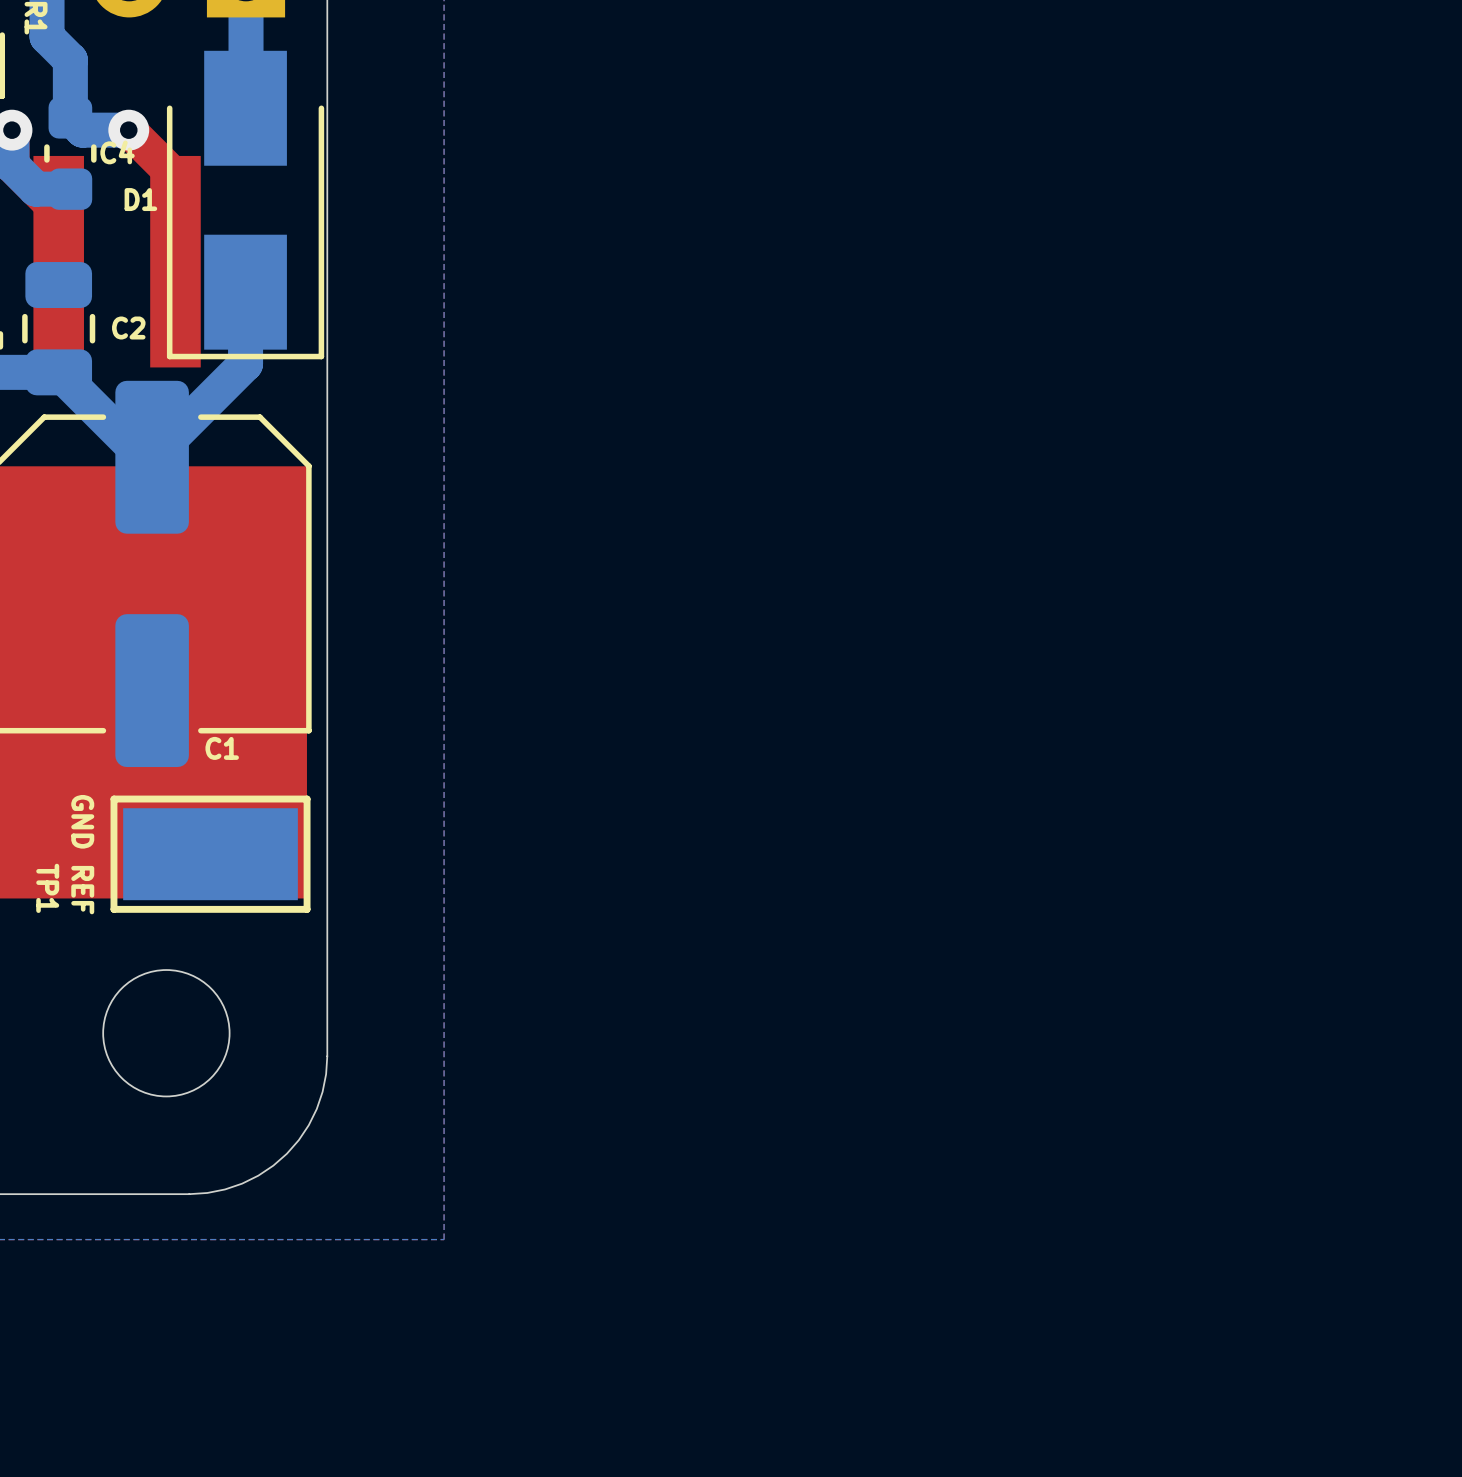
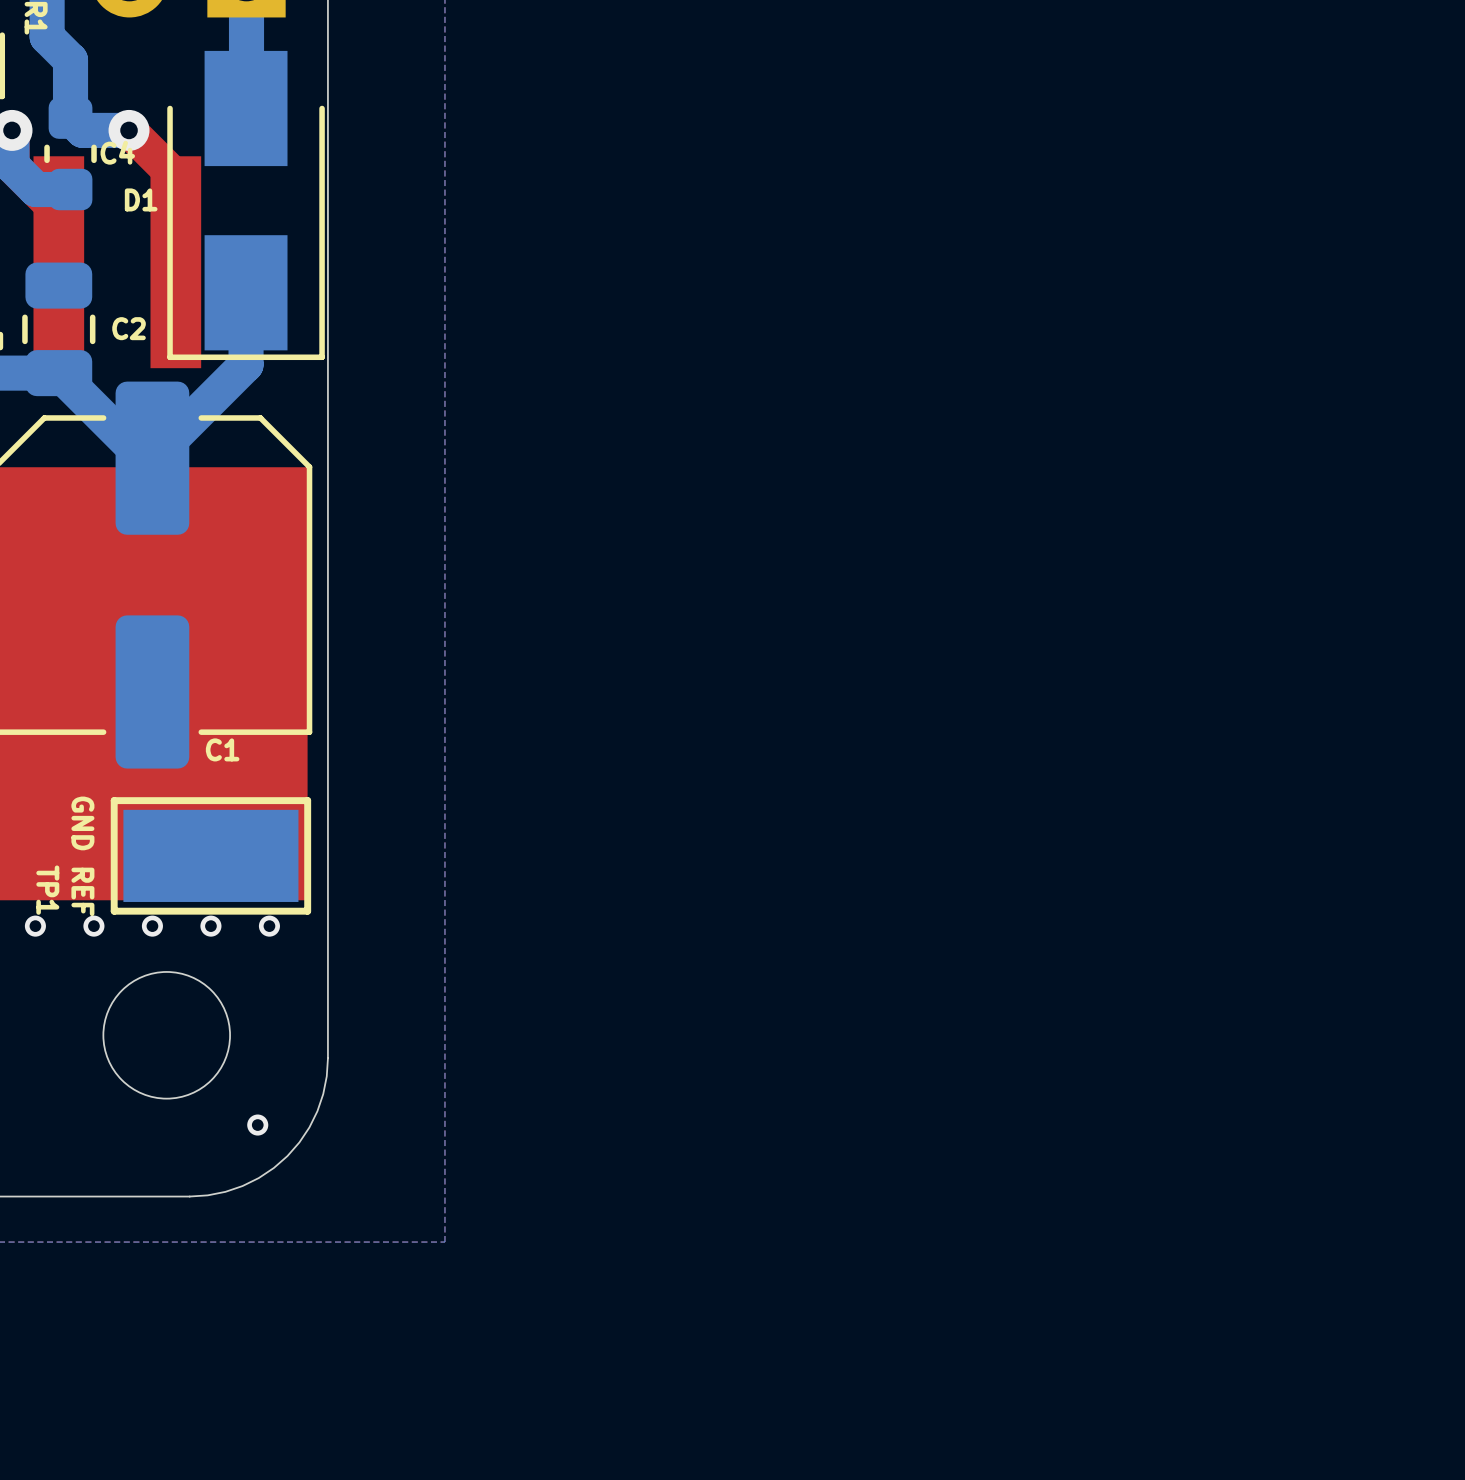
via: none -> (35, 926)
via: none -> (93, 926)
via: none -> (152, 926)
via: none -> (210, 926)
via: none -> (269, 926)
via: none -> (257, 1125)

